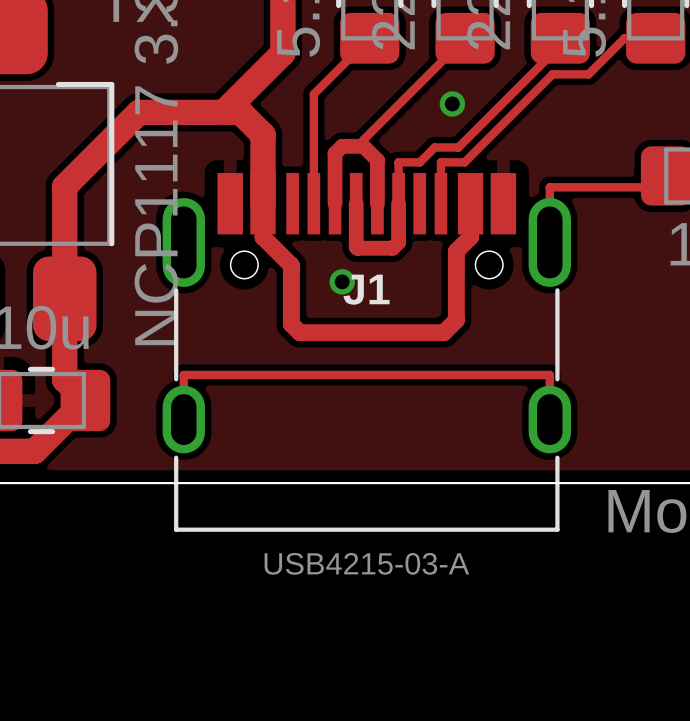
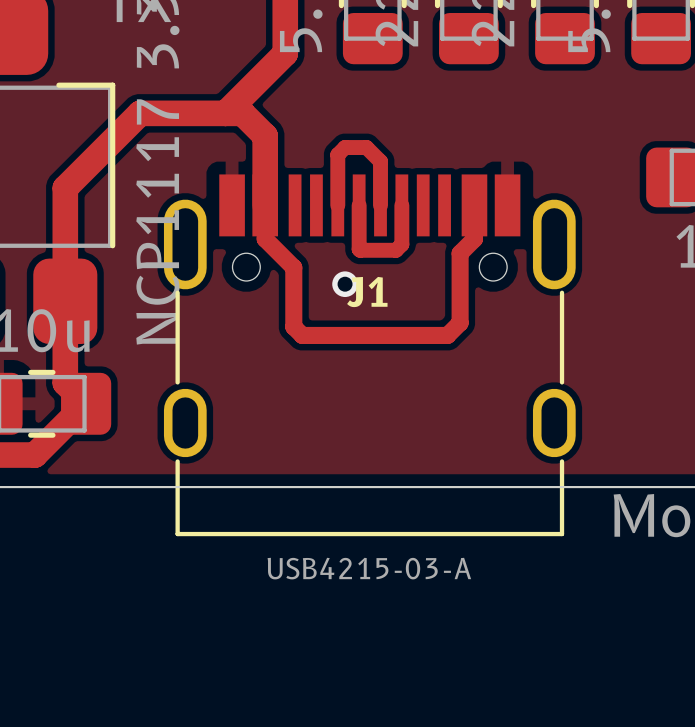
track: (369, 38) (313, 94) (313, 203) -> none
track: (465, 38) (363, 139) (363, 146) -> none
track: (655, 38) (624, 38) (588, 74) (552, 74) (464, 162) (440, 162) (440, 203) -> none
track: (560, 45) (458, 147) (434, 147) (419, 162) (398, 162) (398, 203) -> none
via: (452, 103) -> none
track: (654, 187) (549, 187) (549, 242) -> none
track: (183, 419) (183, 375) (549, 375) (549, 419) -> none

